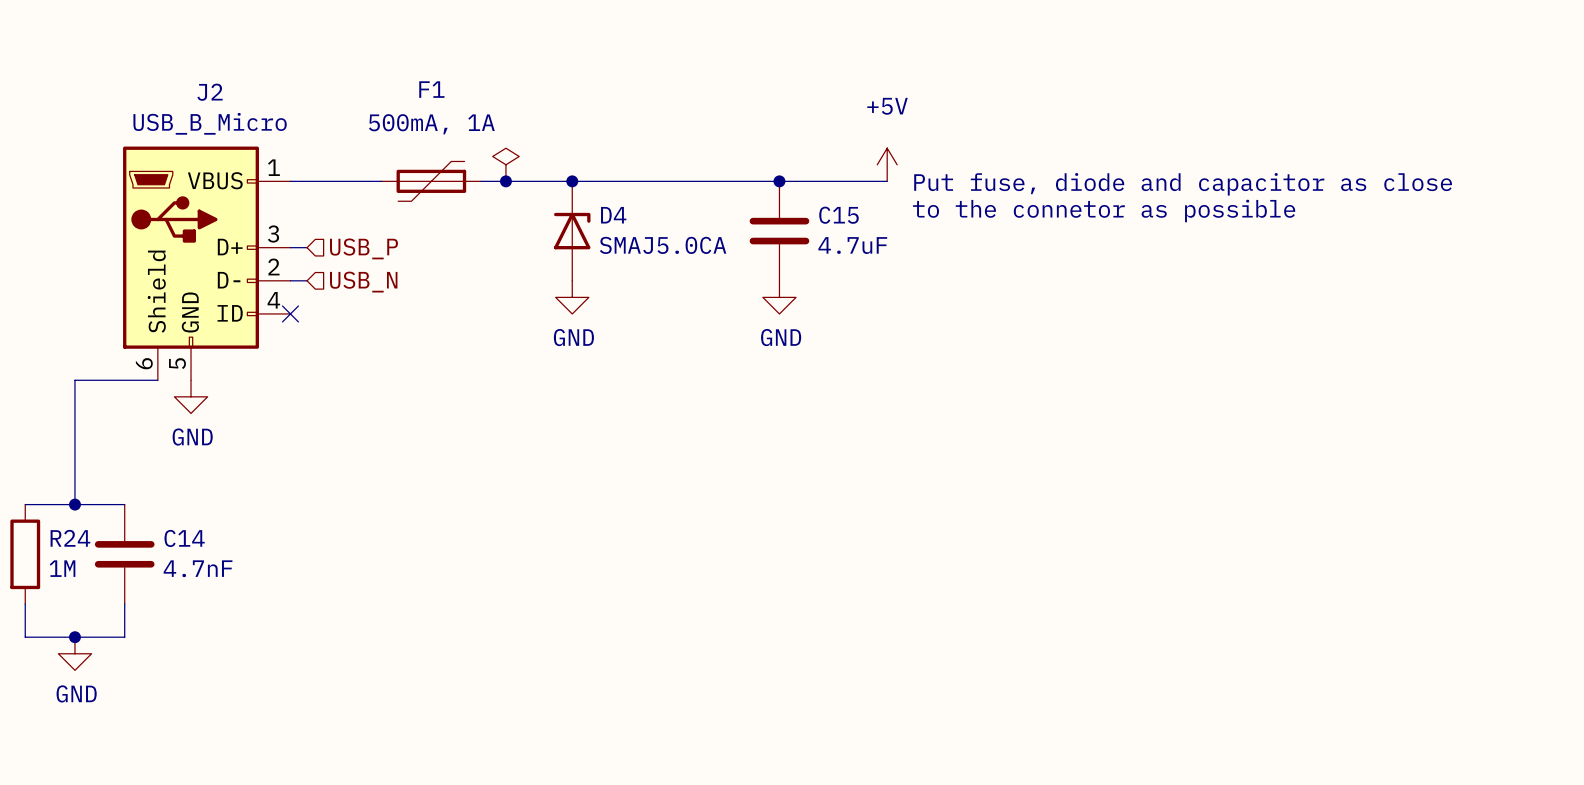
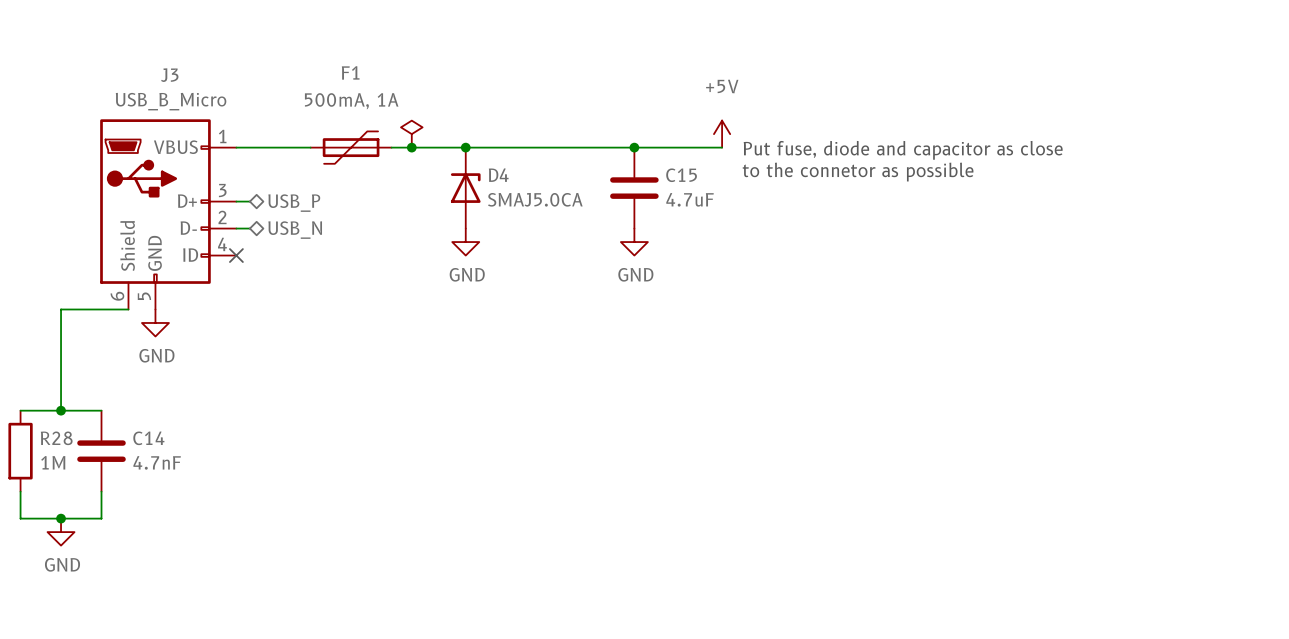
J2 name: J2 (210, 92) -> J3 (169, 75)
hierarchical label shape: input (363, 248) -> bidirectional (294, 203)
hierarchical label shape: input (363, 282) -> bidirectional (295, 230)
R24 name: R24 (70, 538) -> R28 (56, 438)

